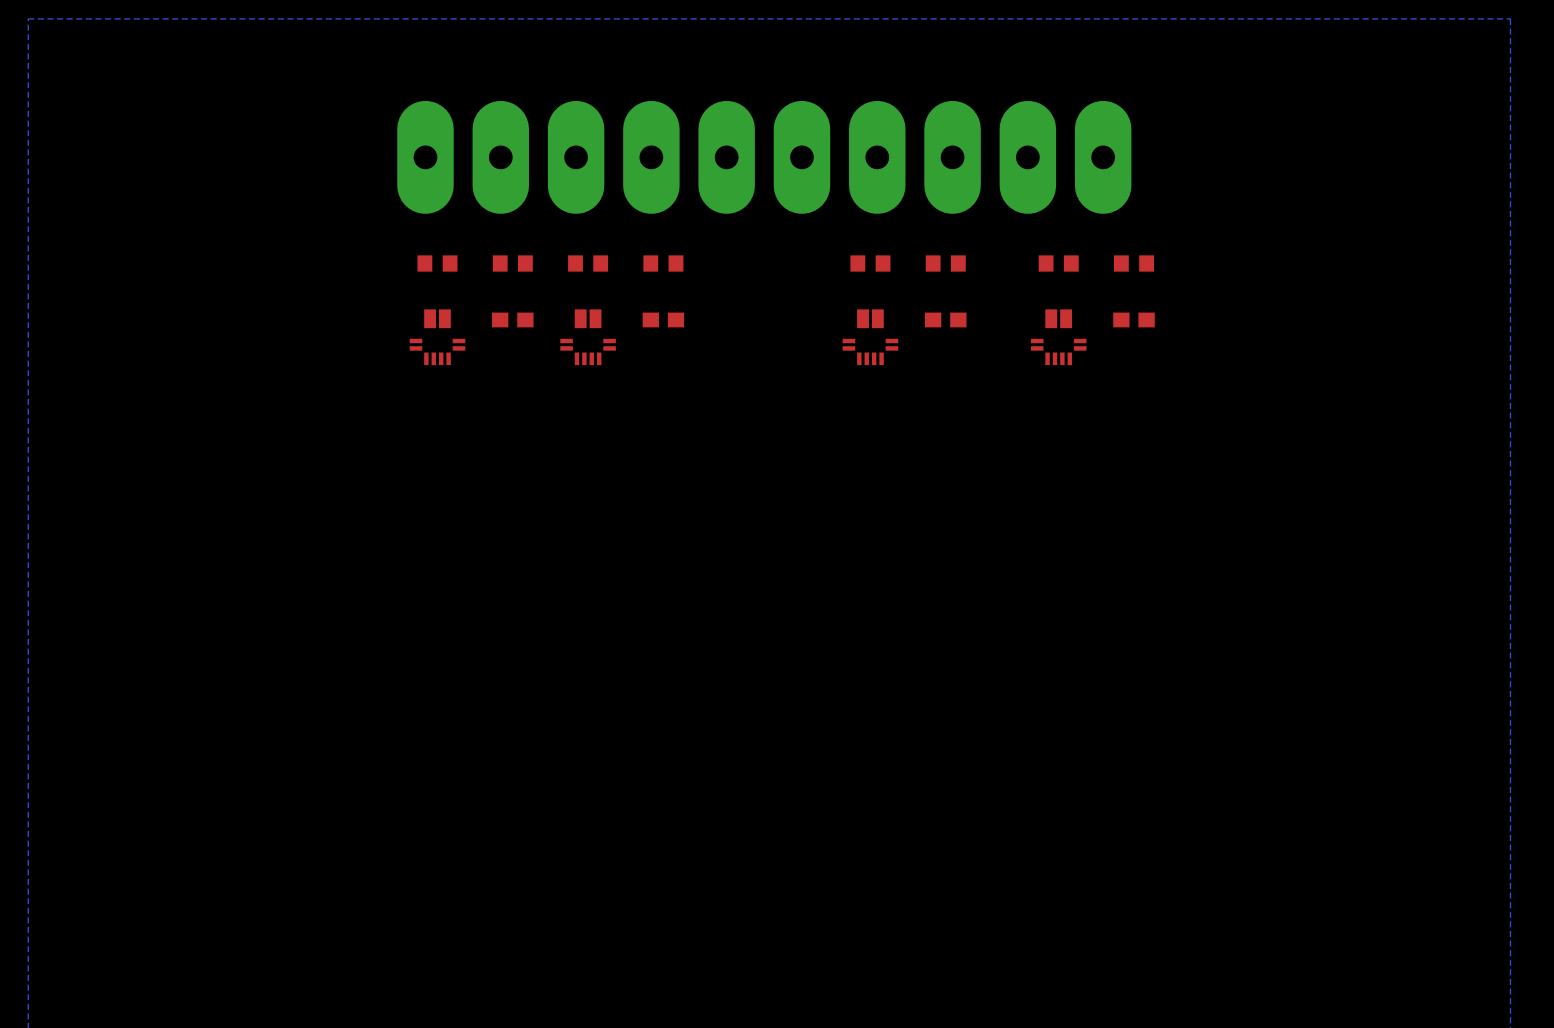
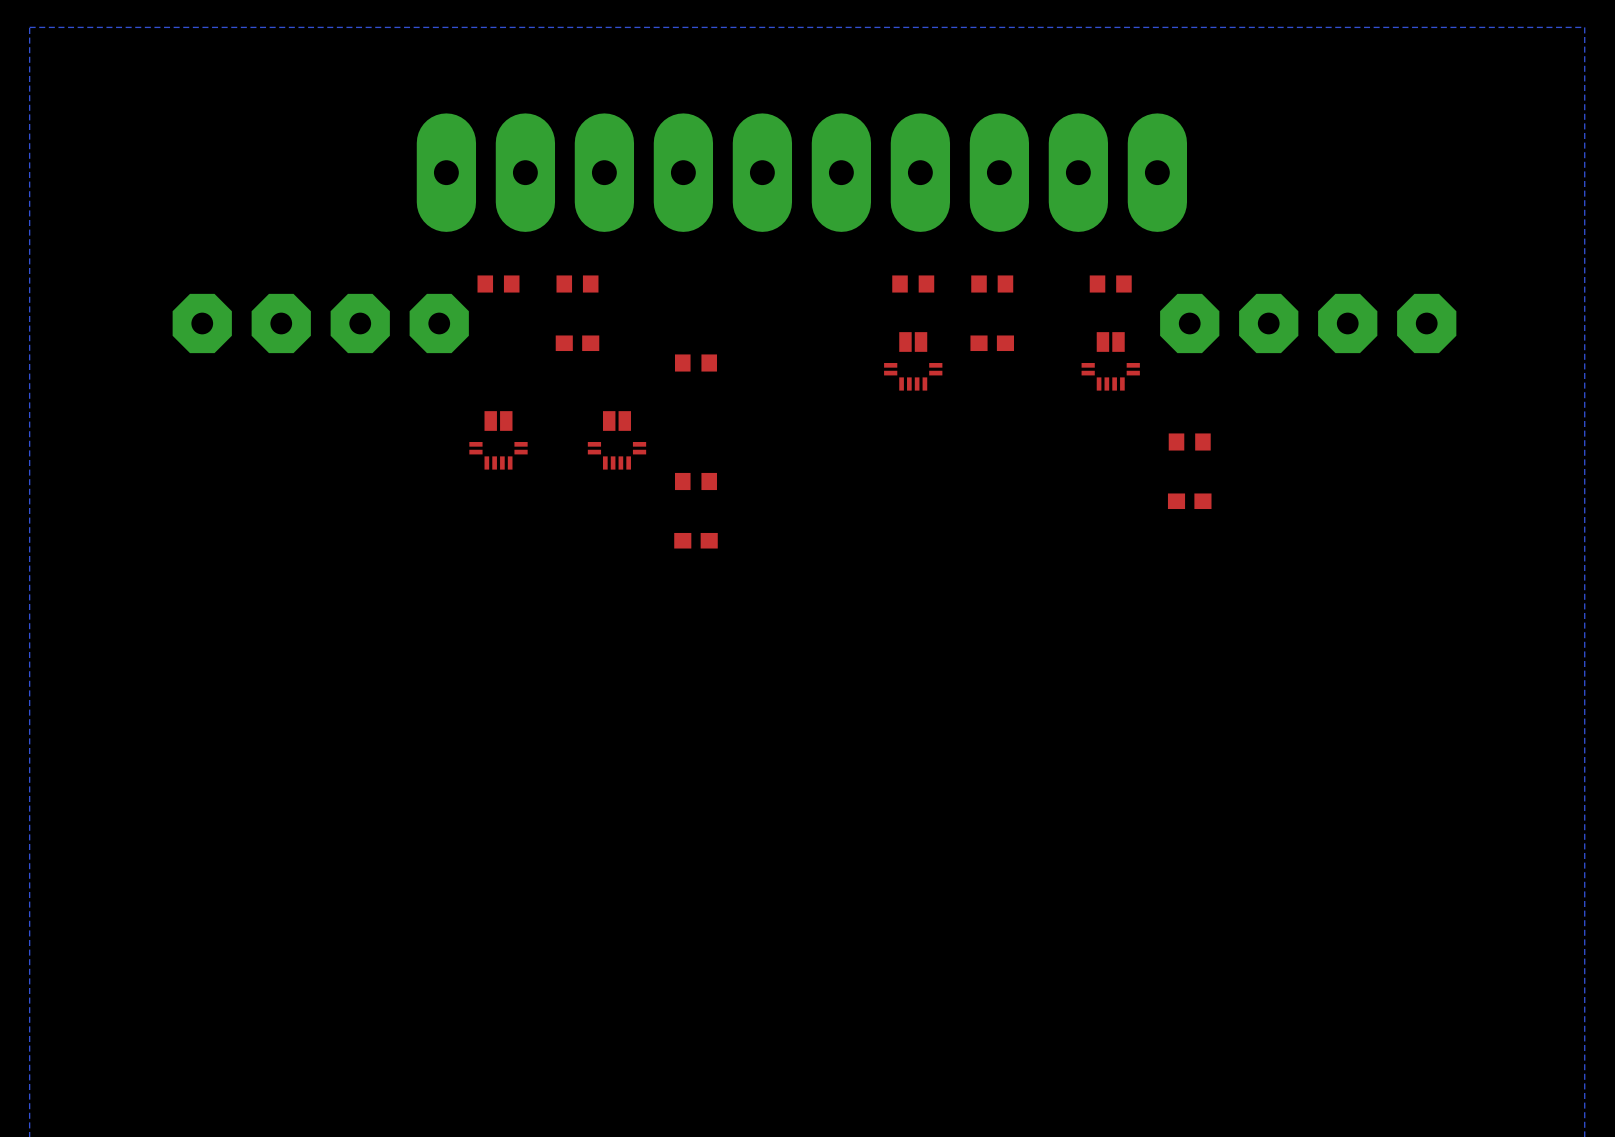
part: (437, 263) -> none
part: none -> (498, 283)
part: (512, 263) -> none
part: none -> (577, 283)
part: (588, 263) -> none
part: (663, 263) -> none
part position: (1133, 263) -> (1189, 441)
part: none -> (202, 323)
part: none -> (281, 323)
part: none -> (360, 323)
part: none -> (439, 323)
part: none -> (1189, 323)
part: none -> (1268, 323)
part: none -> (1347, 323)
part: none -> (1426, 323)
part position: (512, 319) -> (577, 343)
part: (663, 319) -> none
part position: (1133, 319) -> (1189, 501)
part: (437, 337) -> none
part: (588, 337) -> none
part: none -> (695, 362)
part: none -> (498, 440)
part: none -> (616, 440)
part: none -> (695, 481)
part: none -> (695, 540)

